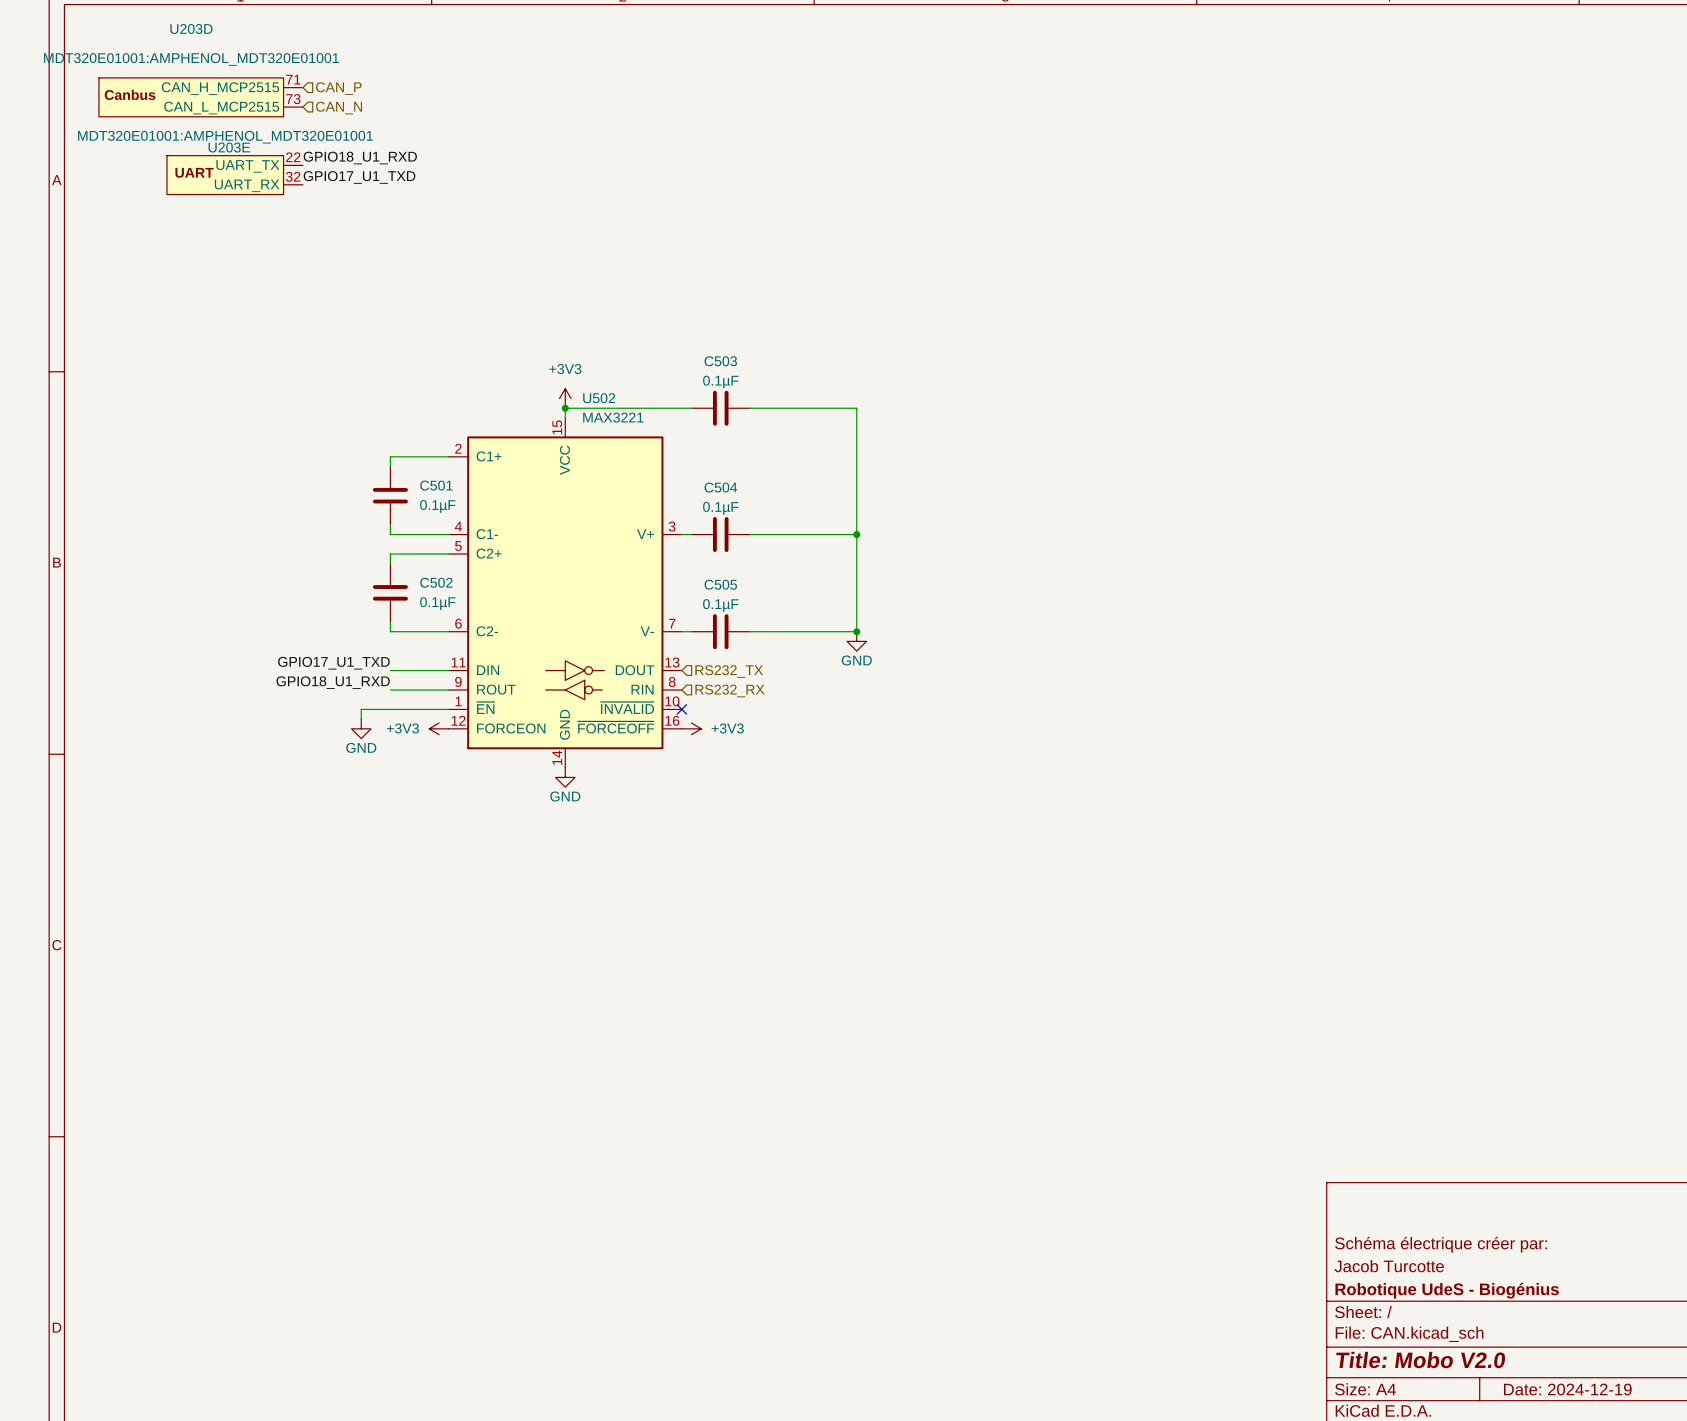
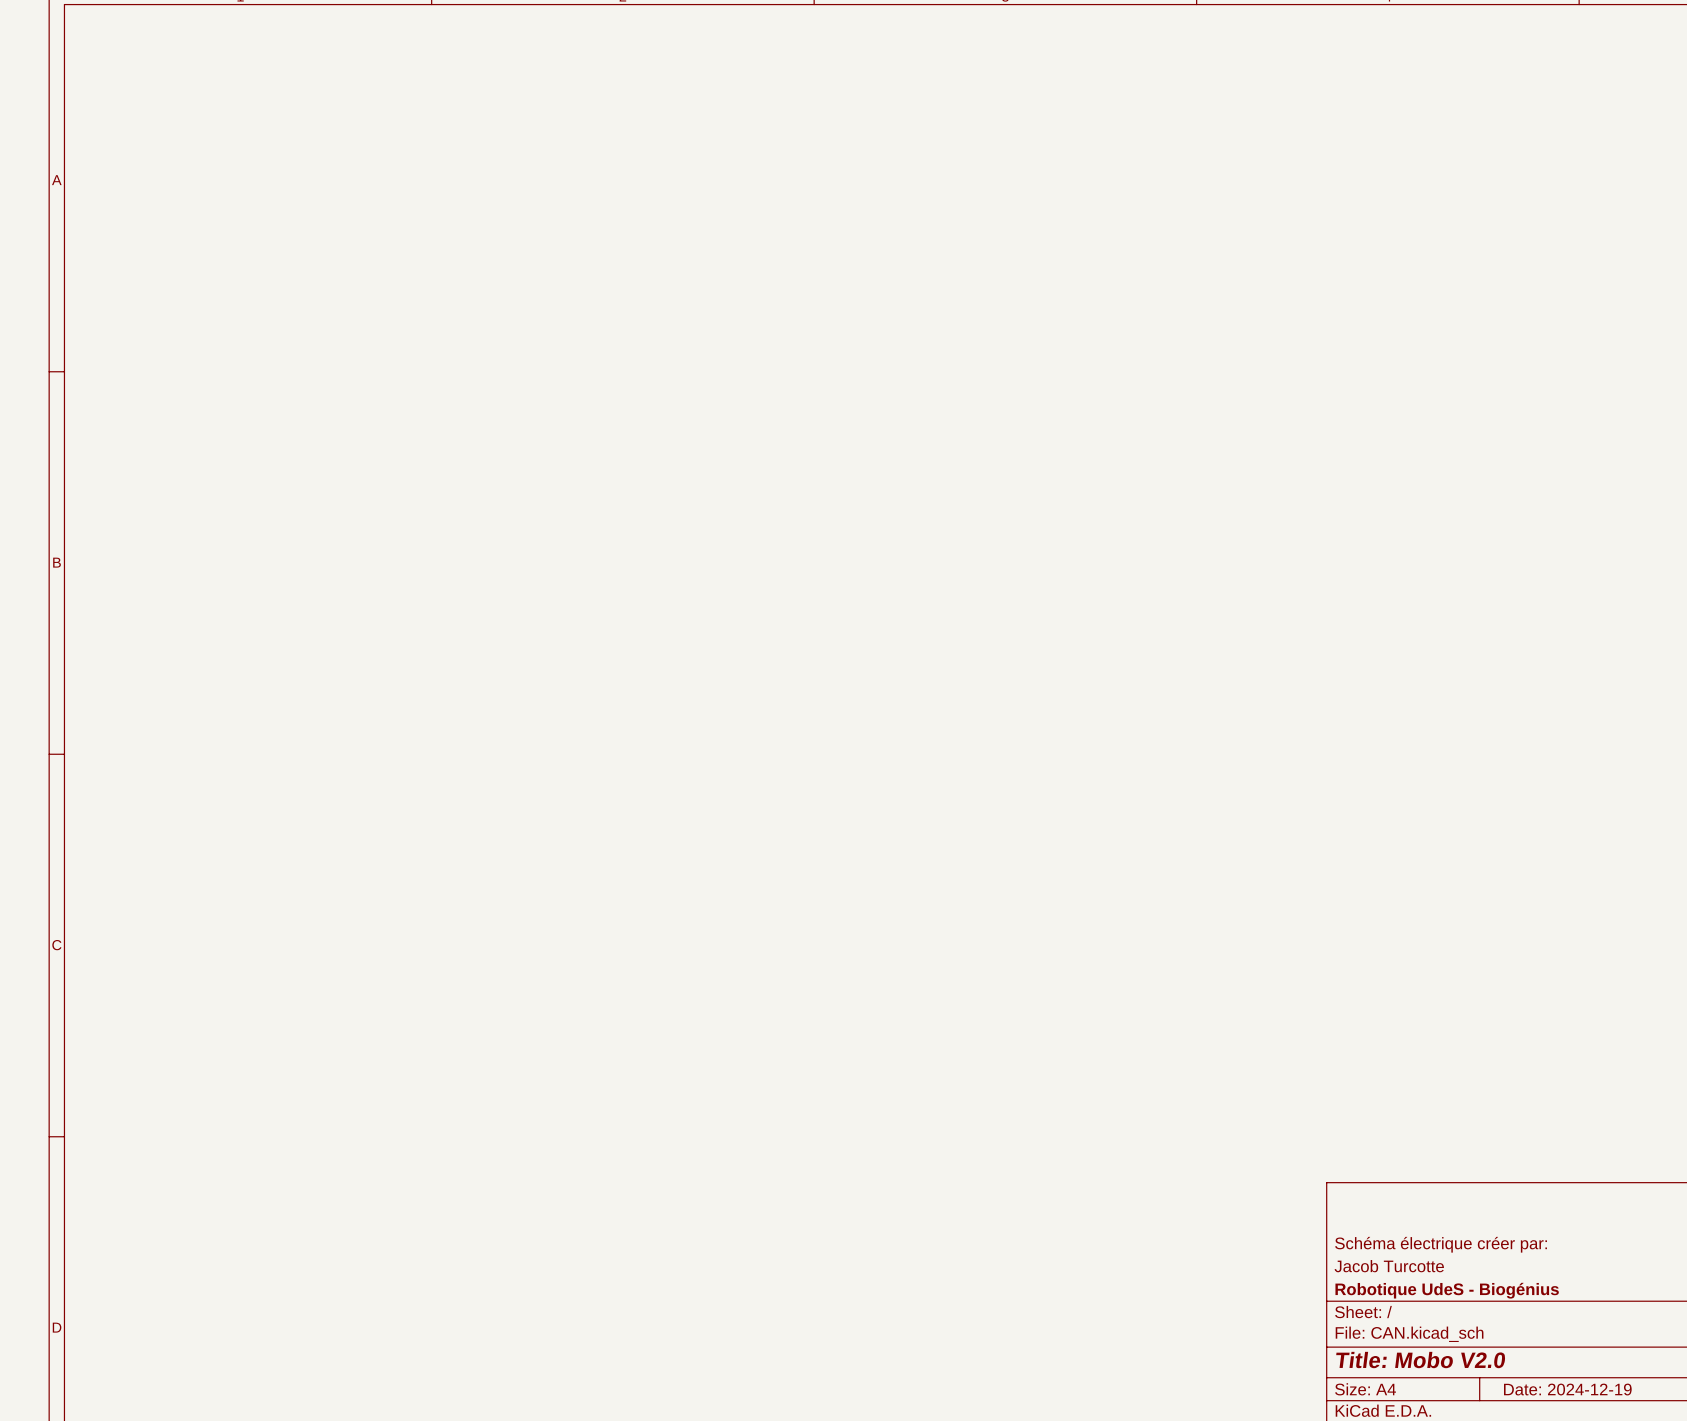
hierarchical label: CAN_P (338, 88) -> none
U203D: (200, 97) -> none
hierarchical label: CAN_N (339, 108) -> none
label: GPIO18_U1_RXD (360, 158) -> none
U203E: (234, 175) -> none
label: GPIO17_U1_TXD (359, 177) -> none
power symbol: +3V3 (565, 398) -> none
junction: (565, 408) -> none
wire: (691, 408) (565, 408) (565, 417) -> none
C503: 0.1µF (720, 408) -> none
wire: (749, 408) (856, 408) (856, 631) (749, 631) -> none
wire: (448, 456) (390, 456) (390, 466) -> none
C501: 0.1µF (390, 495) -> none
wire: (390, 524) (390, 534) (448, 534) -> none
wire: (681, 534) (691, 534) -> none
C504: 0.1µF (720, 534) -> none
wire: (749, 534) (856, 534) -> none
junction: (856, 534) -> none
wire: (448, 553) (390, 553) (390, 563) -> none
C502: 0.1µF (390, 592) -> none
U502: MAX3221 (565, 592) -> none
wire: (390, 621) (390, 631) (448, 631) -> none
wire: (681, 631) (691, 631) -> none
C505: 0.1µF (720, 631) -> none
junction: (856, 631) -> none
power symbol: GND (856, 641) -> none
label: GPIO17_U1_TXD (333, 663) -> none
wire: (390, 670) (448, 670) -> none
hierarchical label: RS232_TX (729, 671) -> none
label: GPIO18_U1_RXD (333, 682) -> none
wire: (390, 689) (448, 689) -> none
hierarchical label: RS232_RX (729, 690) -> none
wire: (448, 709) (361, 709) (361, 719) -> none
no-connect mark: (681, 709) -> none
power symbol: GND (361, 728) -> none
power symbol: +3V3 (439, 728) -> none
power symbol: +3V3 (691, 728) -> none
power symbol: GND (565, 777) -> none

